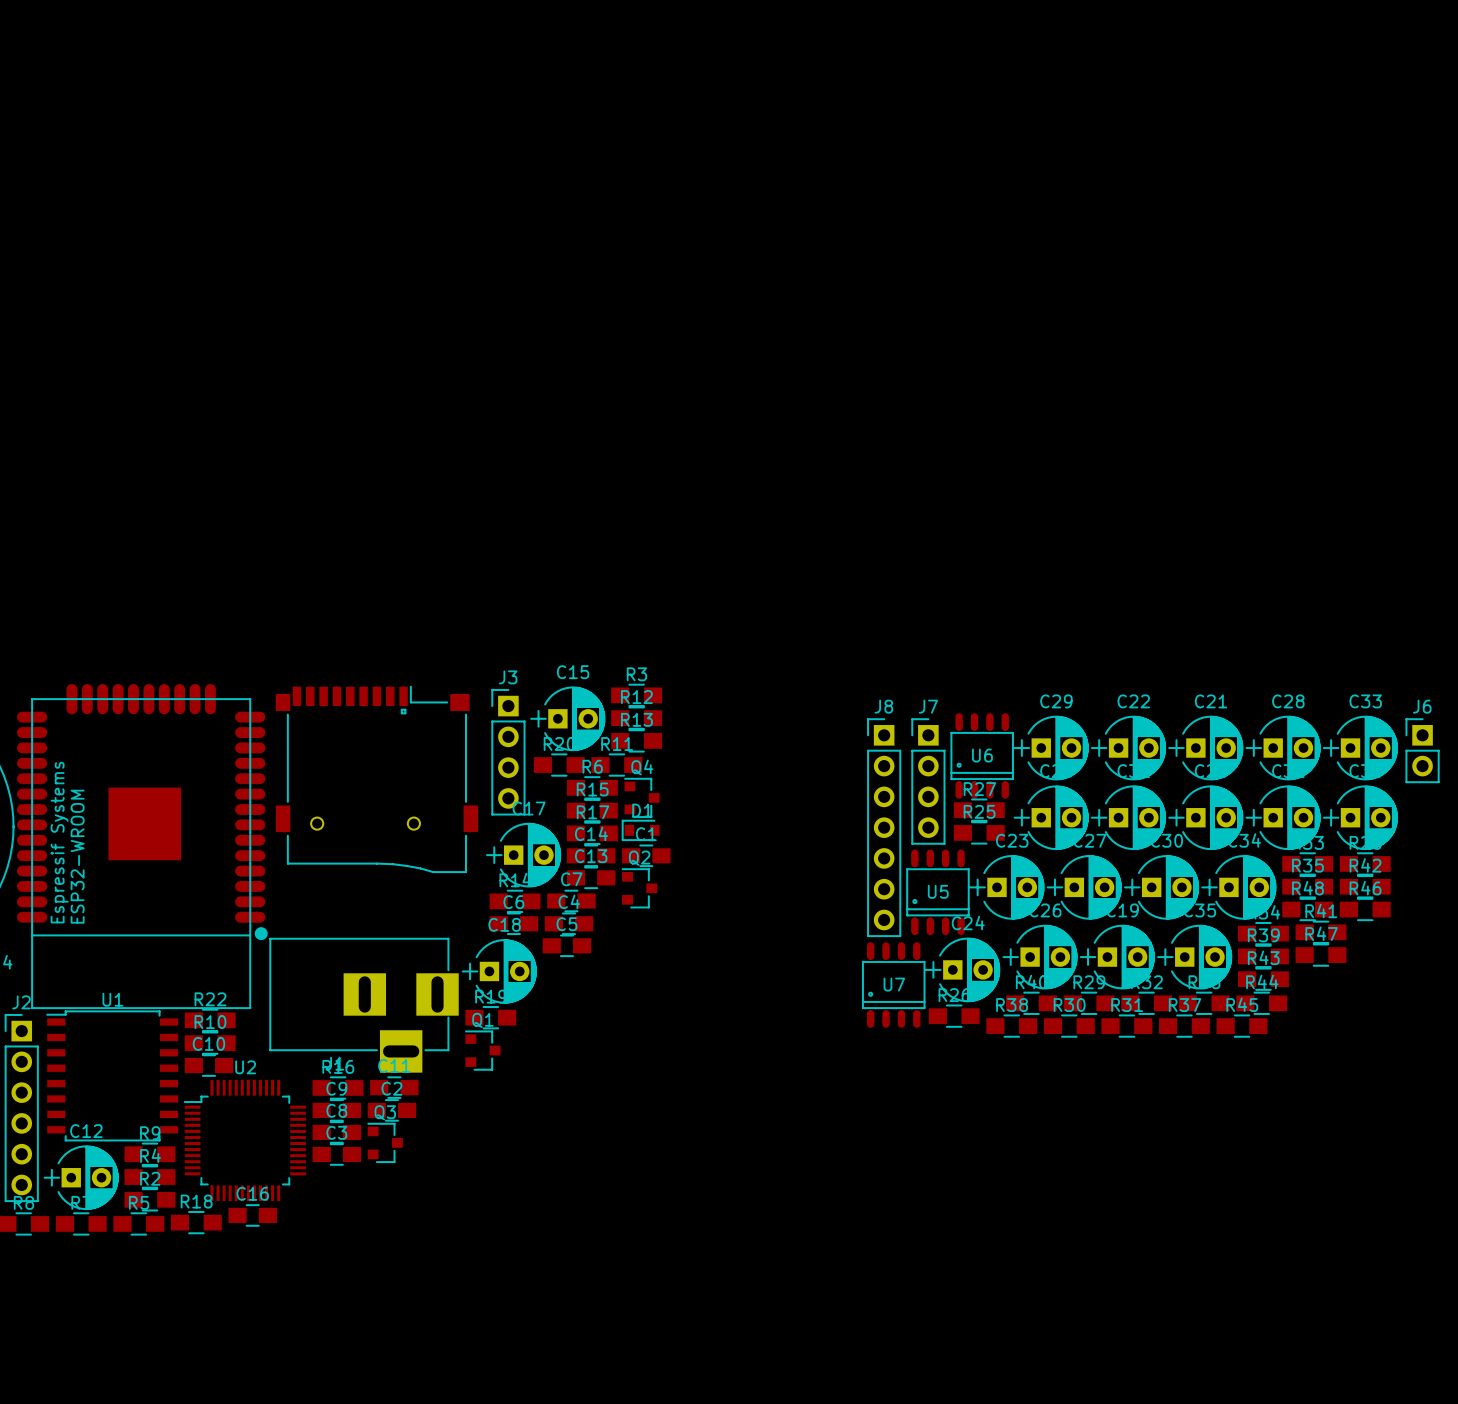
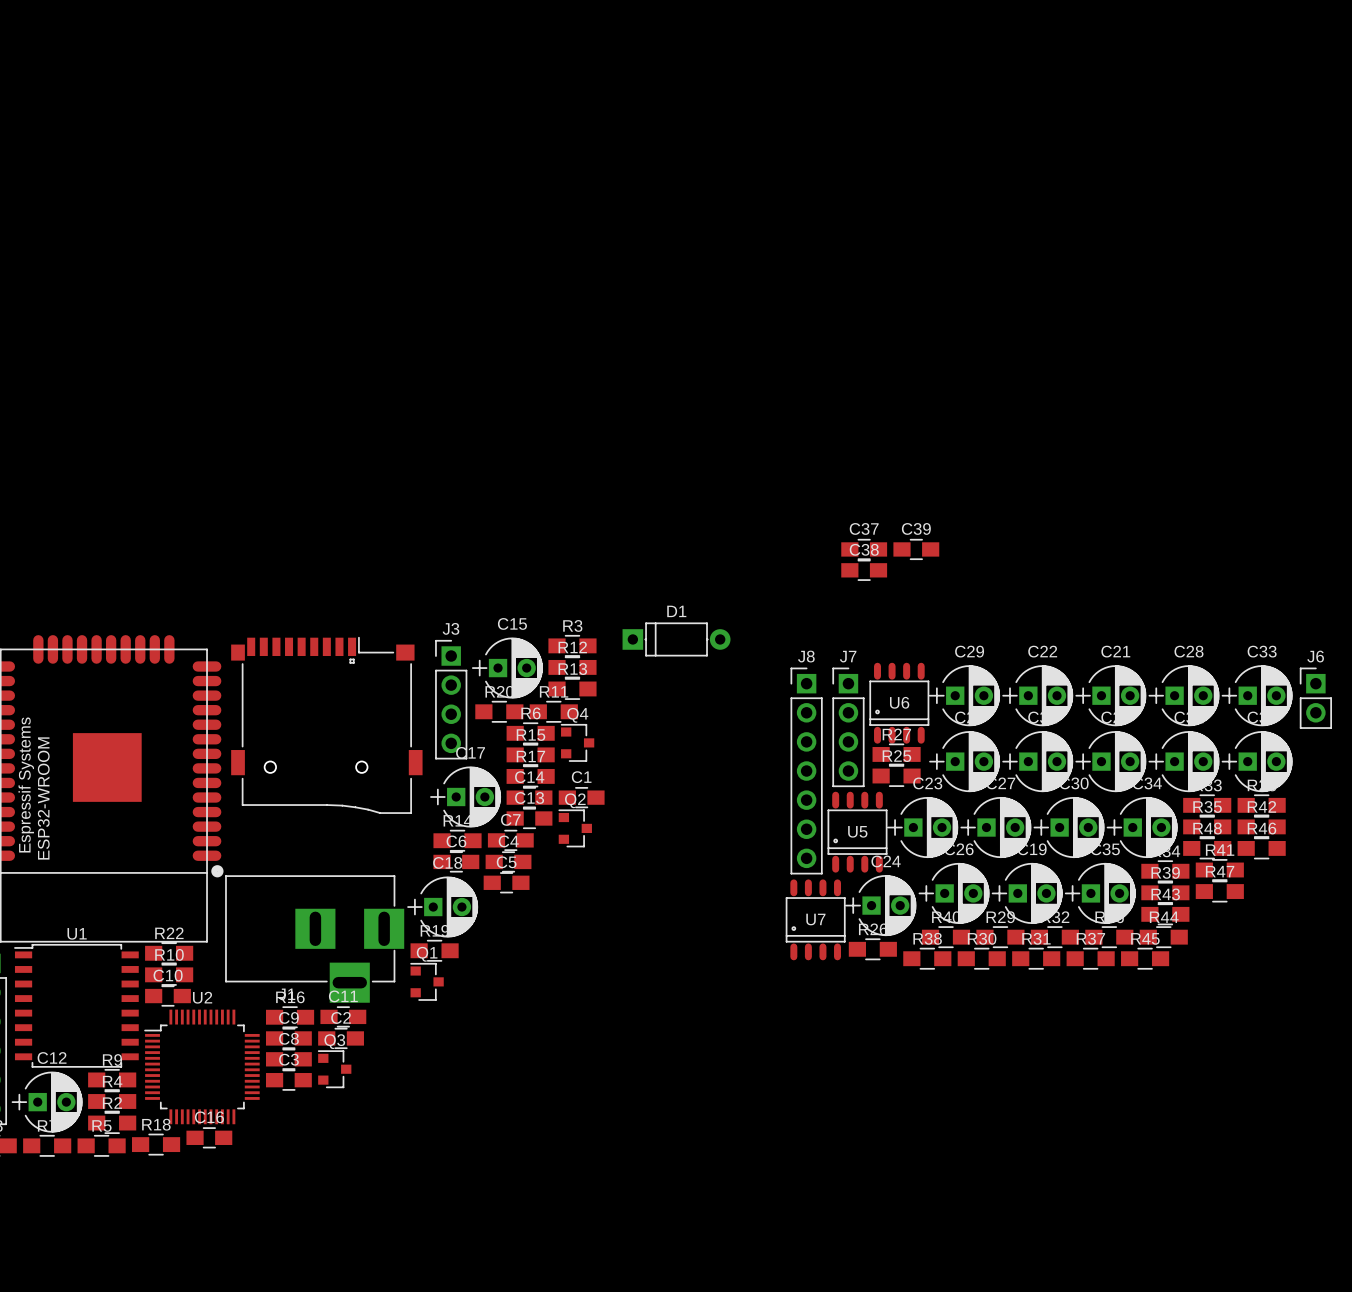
C37: none -> (864, 549)
C39: none -> (916, 549)
C38: none -> (864, 570)
D1 footprint: [621, 819, 660, 841] -> [622, 622, 731, 657]

